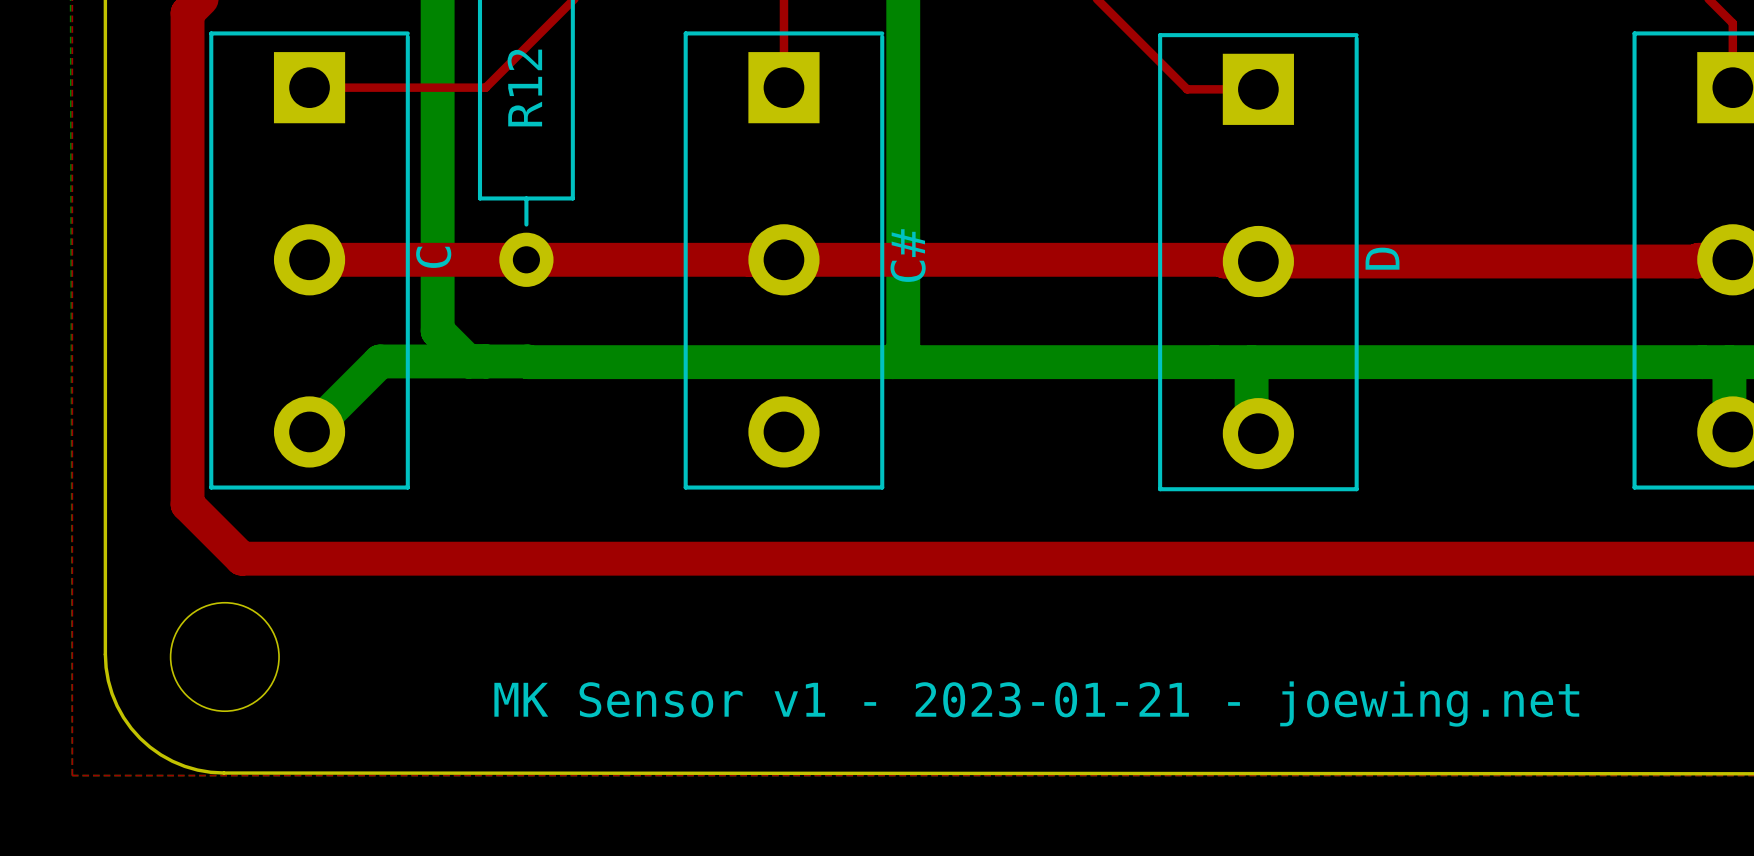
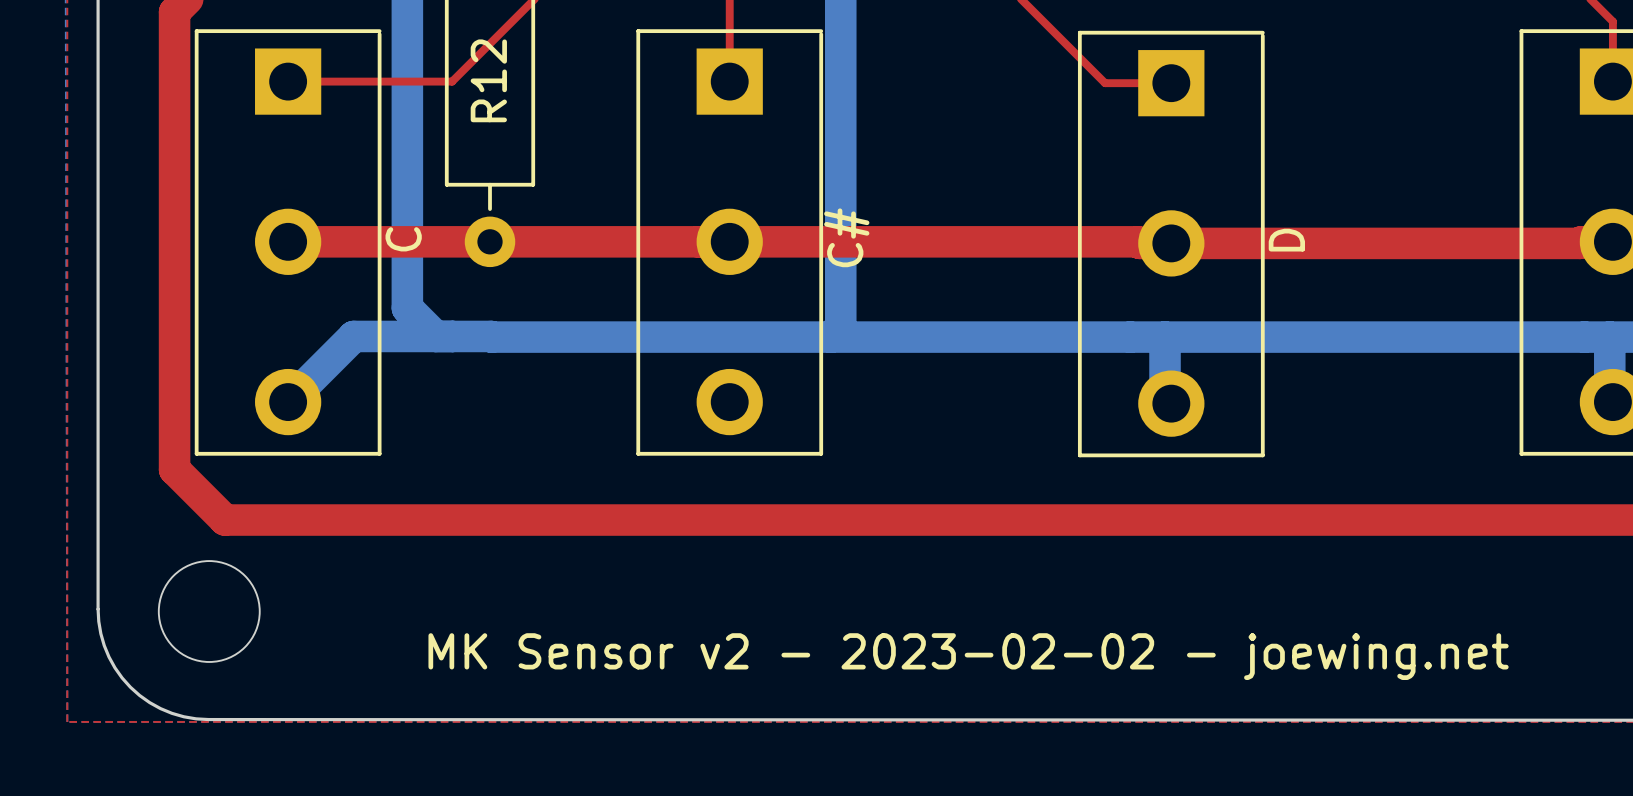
text: MK Sensor v1 - 2023-01-21 - joewing.net (1036, 704) -> MK Sensor v2 - 2023-02-02 - joewing.net (968, 656)

